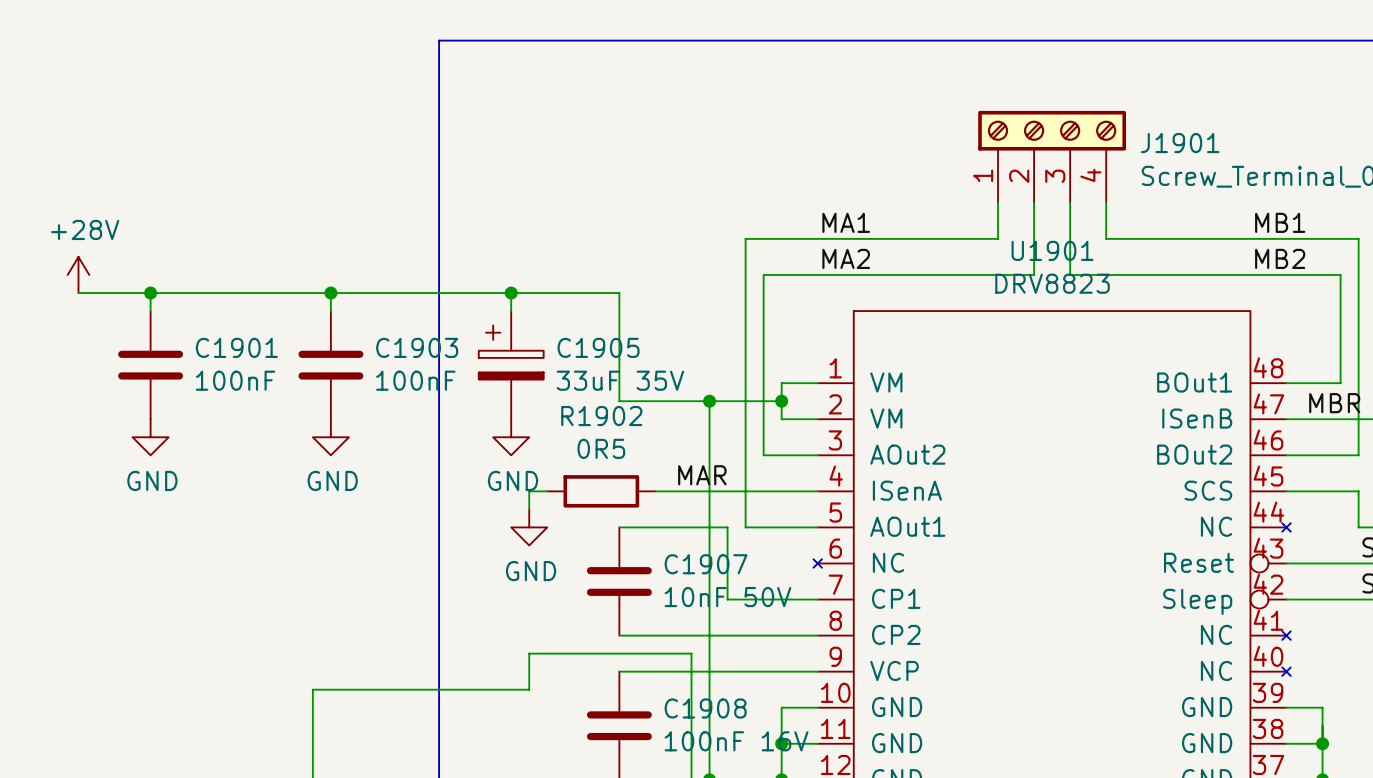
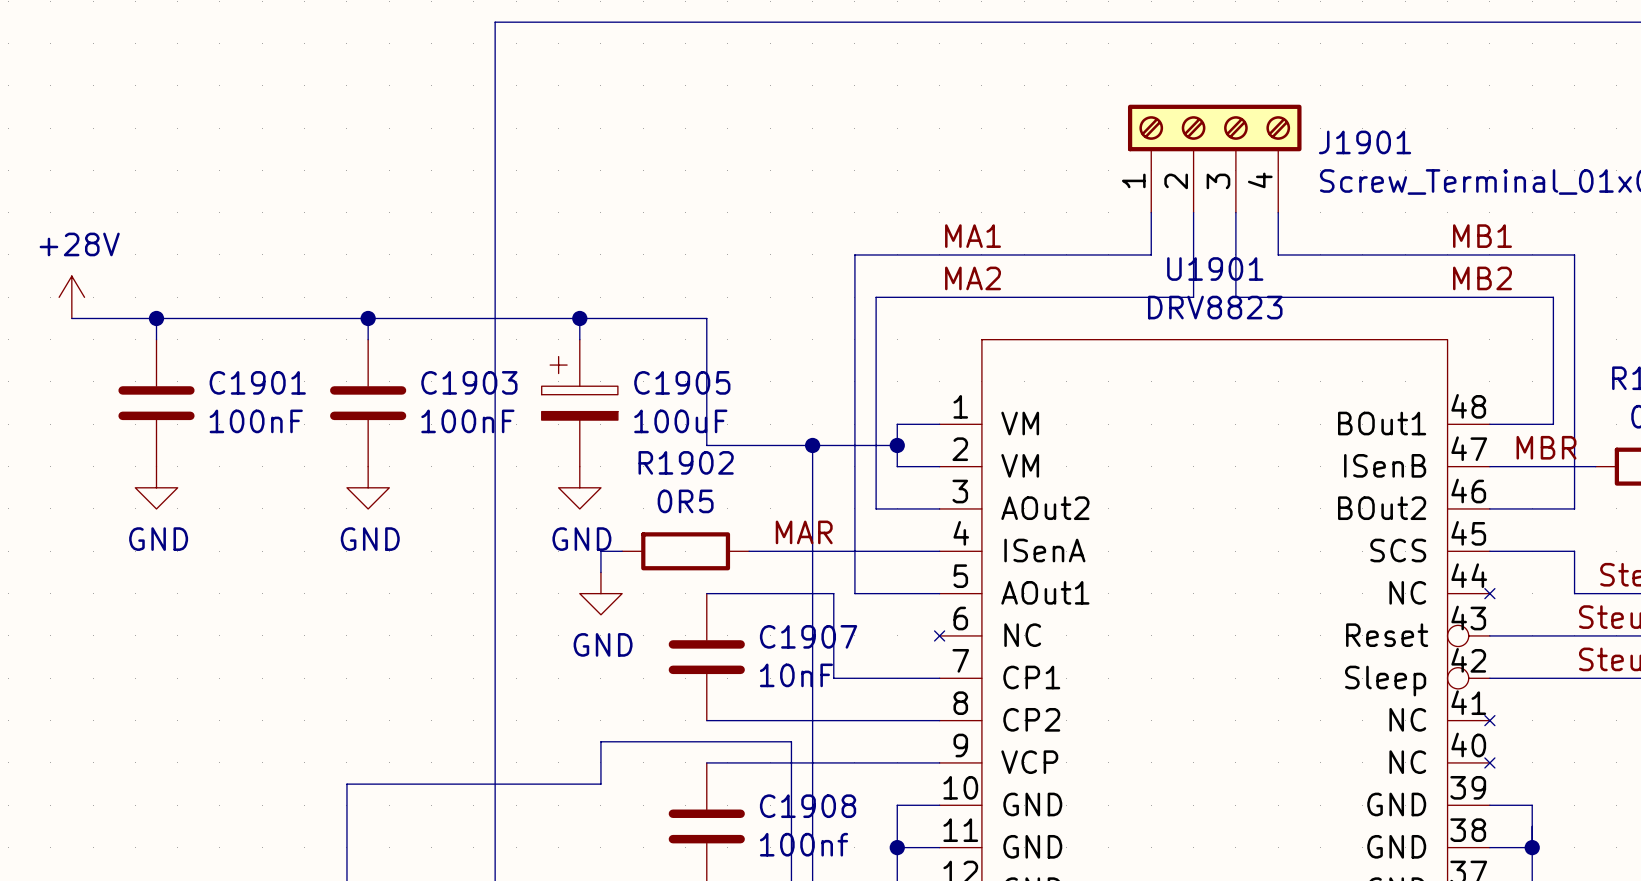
C1905 value: 33uF 35V (620, 380) -> 100uF (680, 421)
C1907 value: 10nF 50V (727, 597) -> 10nF (796, 675)
C1908 value: 100nF 16V (736, 741) -> 100nf (804, 844)

